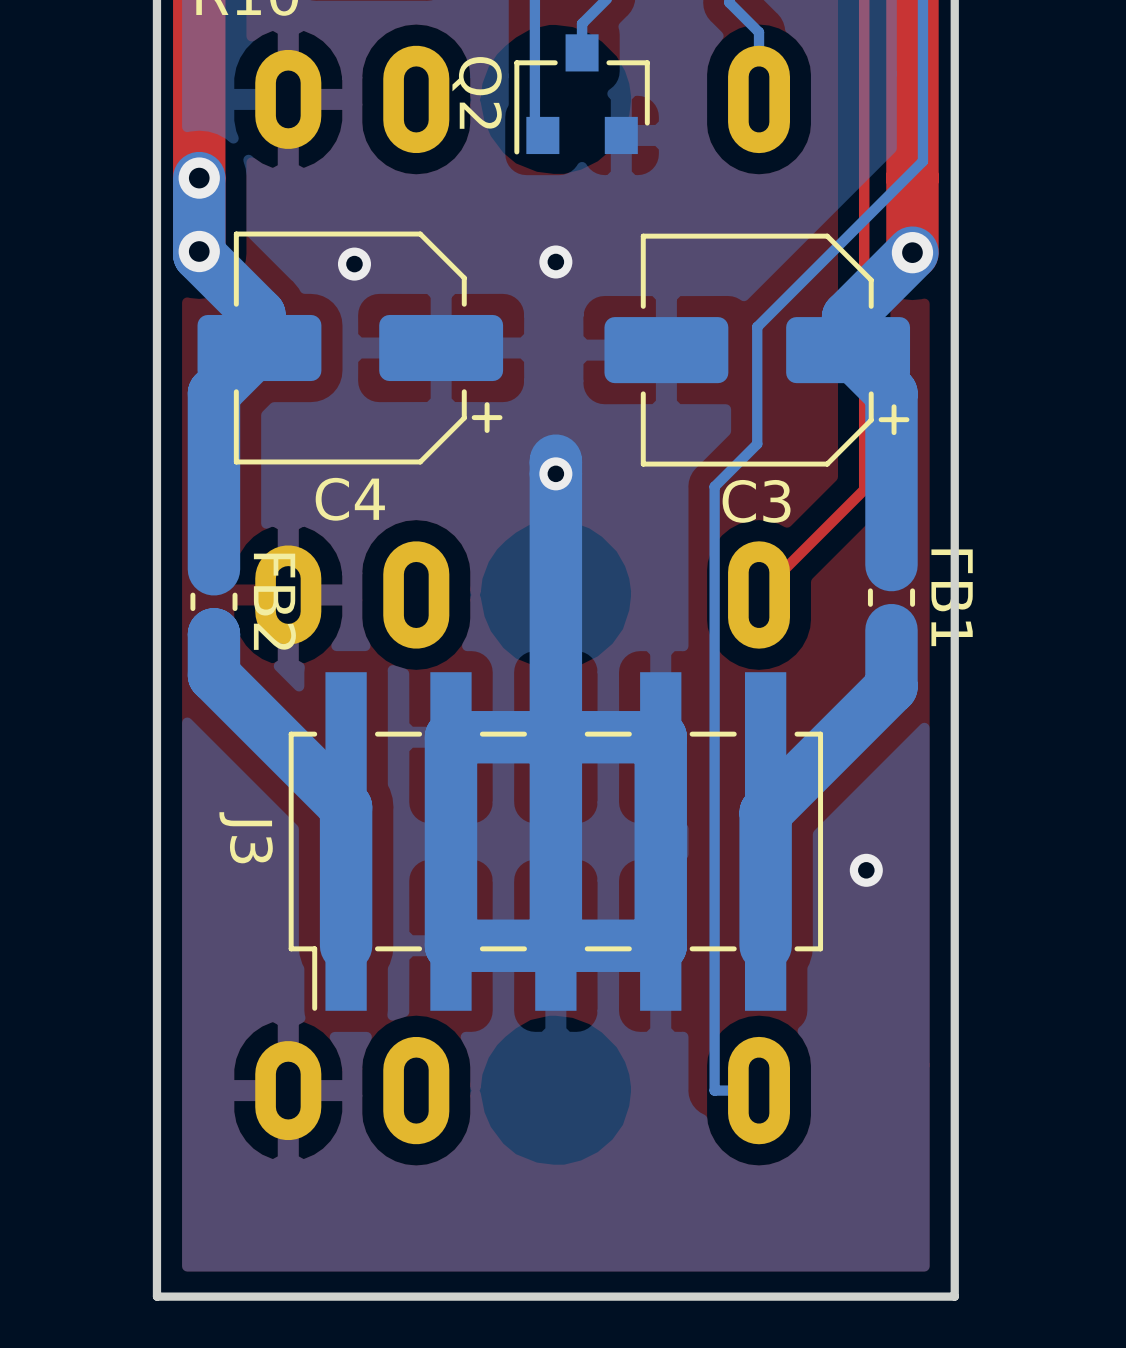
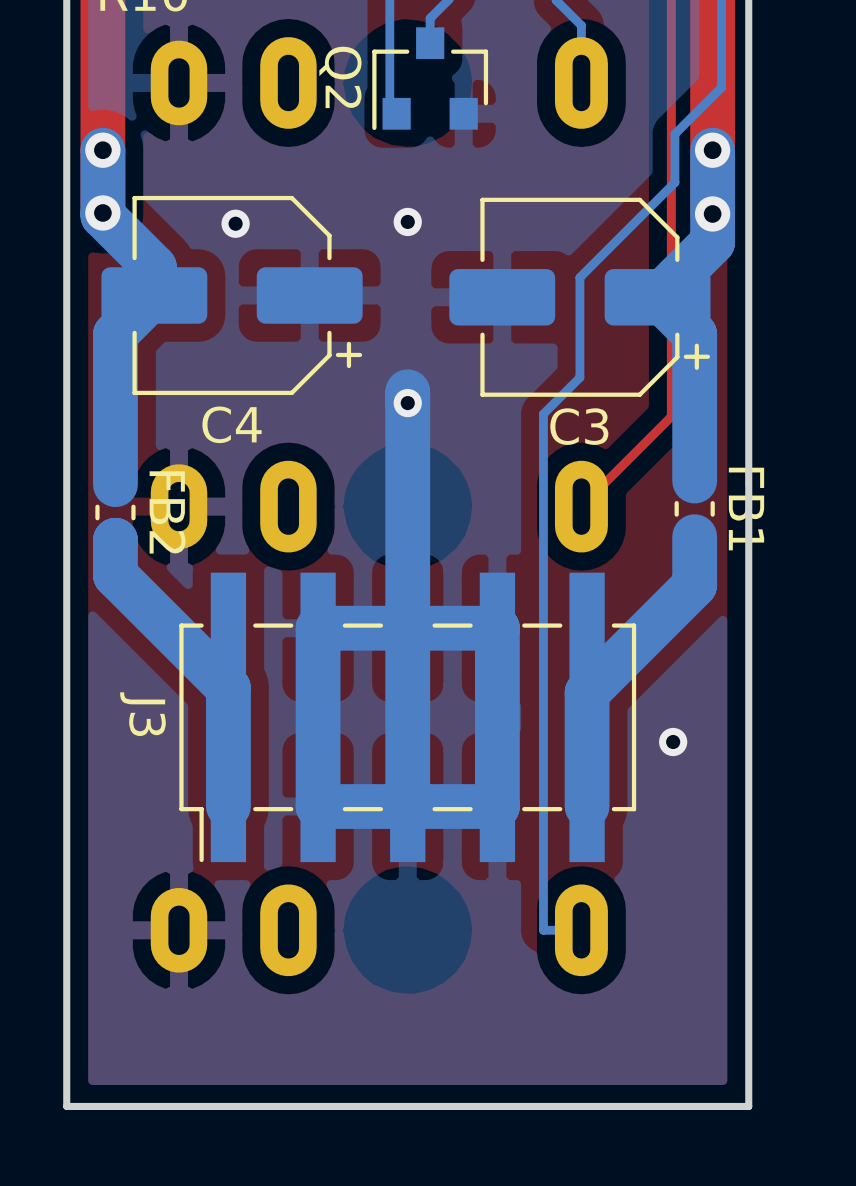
bottom track: (922, 104) (922, 161) (868, 215) -> (721, 87) (674, 134) (674, 182)
via: none -> (712, 150)
bottom track: (912, 252) (848, 317) (848, 350) -> (712, 150) (712, 242) (657, 297)

